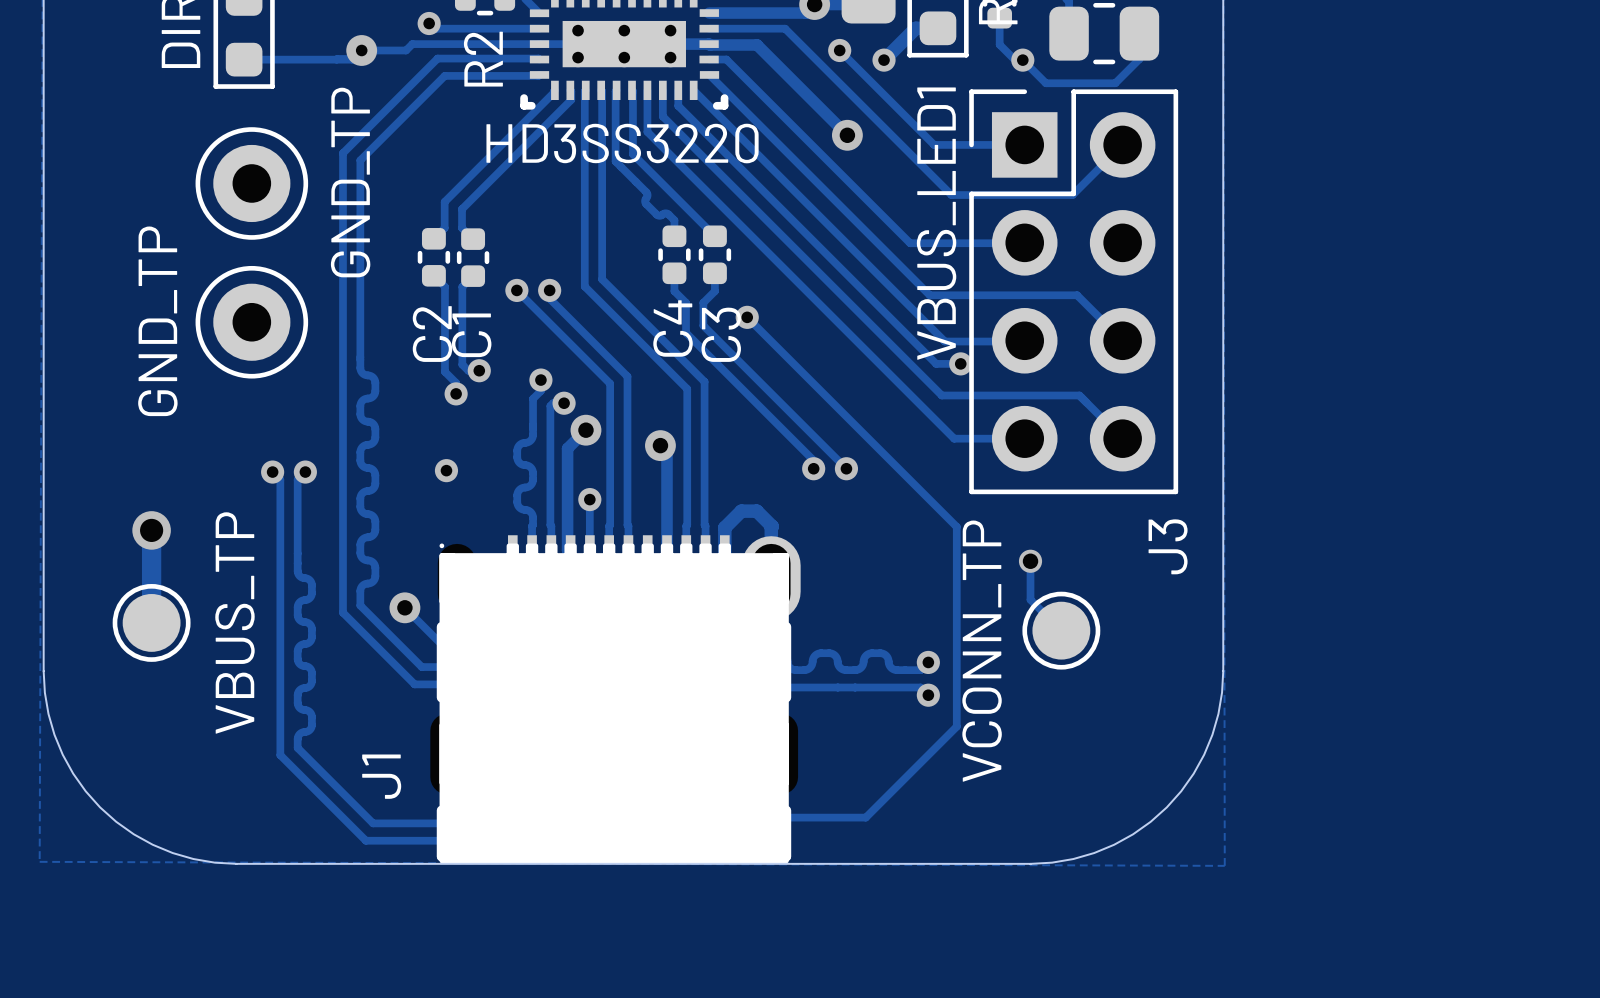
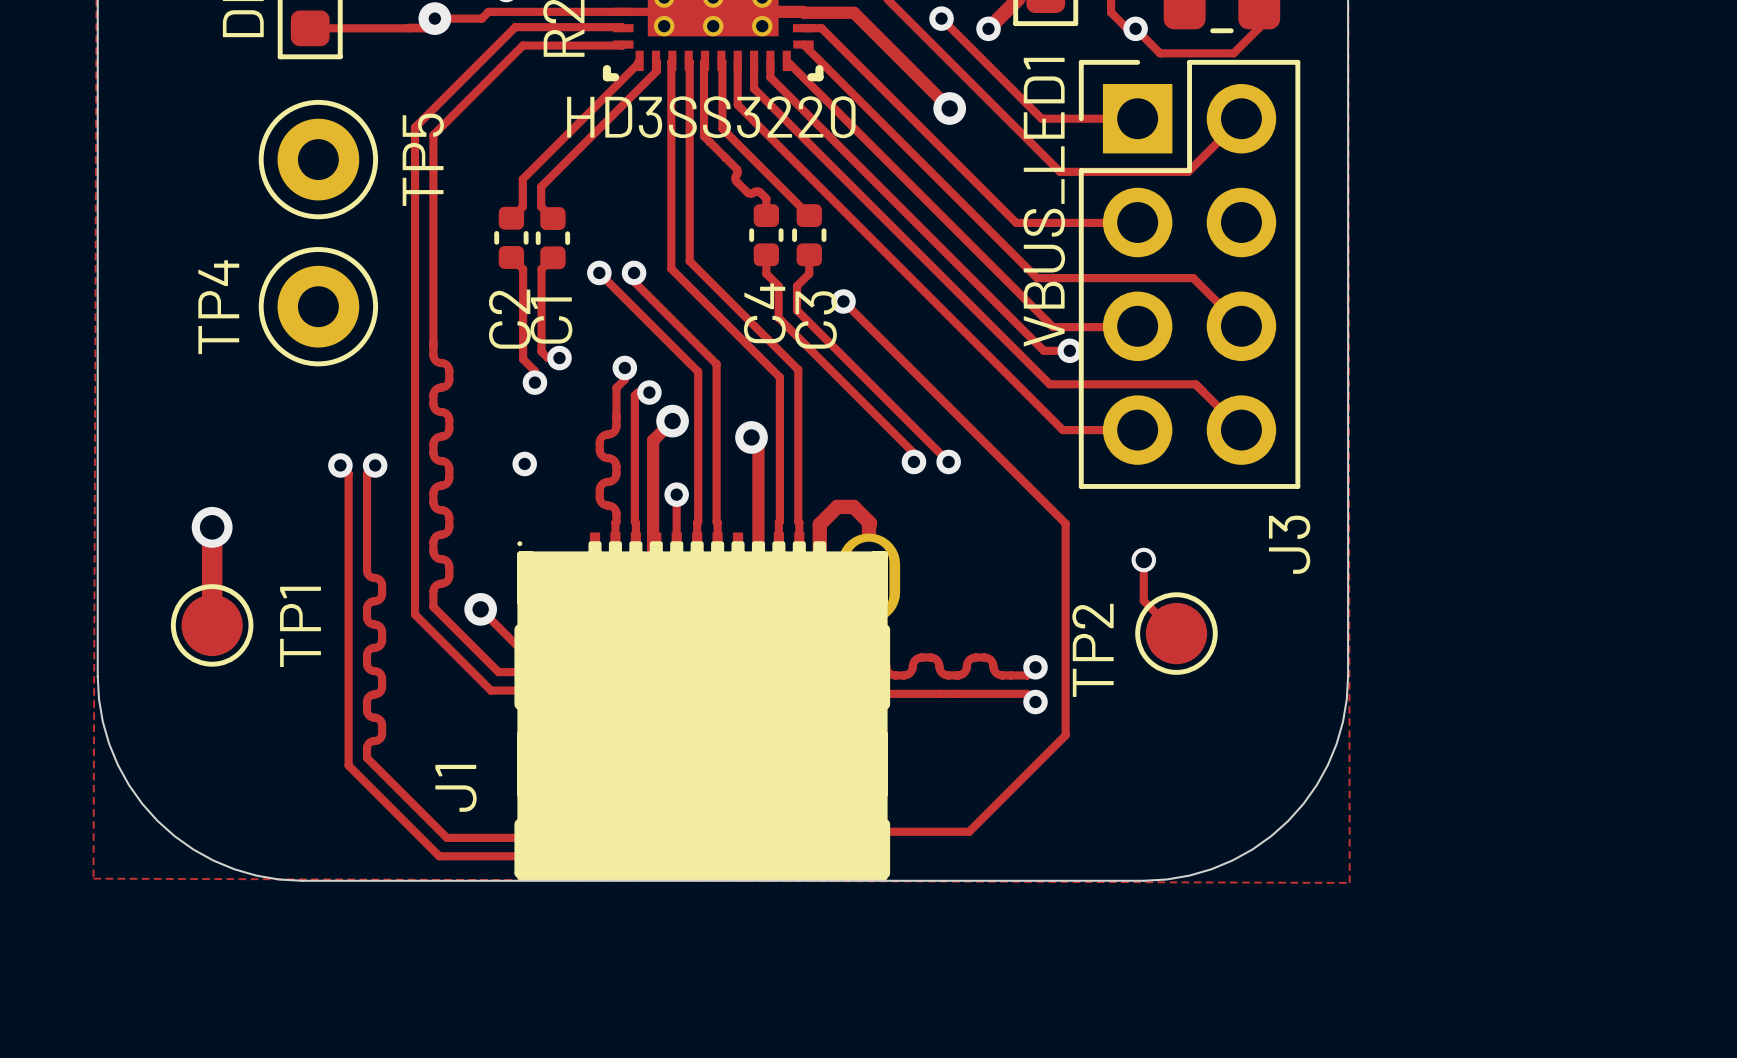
GND_TP name: GND_TP (350, 182) -> TP5 (423, 159)
GND_TP name: GND_TP (157, 321) -> TP4 (218, 307)
VBUS_TP name: VBUS_TP (234, 622) -> TP1 (300, 626)
VCONN_TP name: VCONN_TP (982, 651) -> TP2 (1092, 650)

